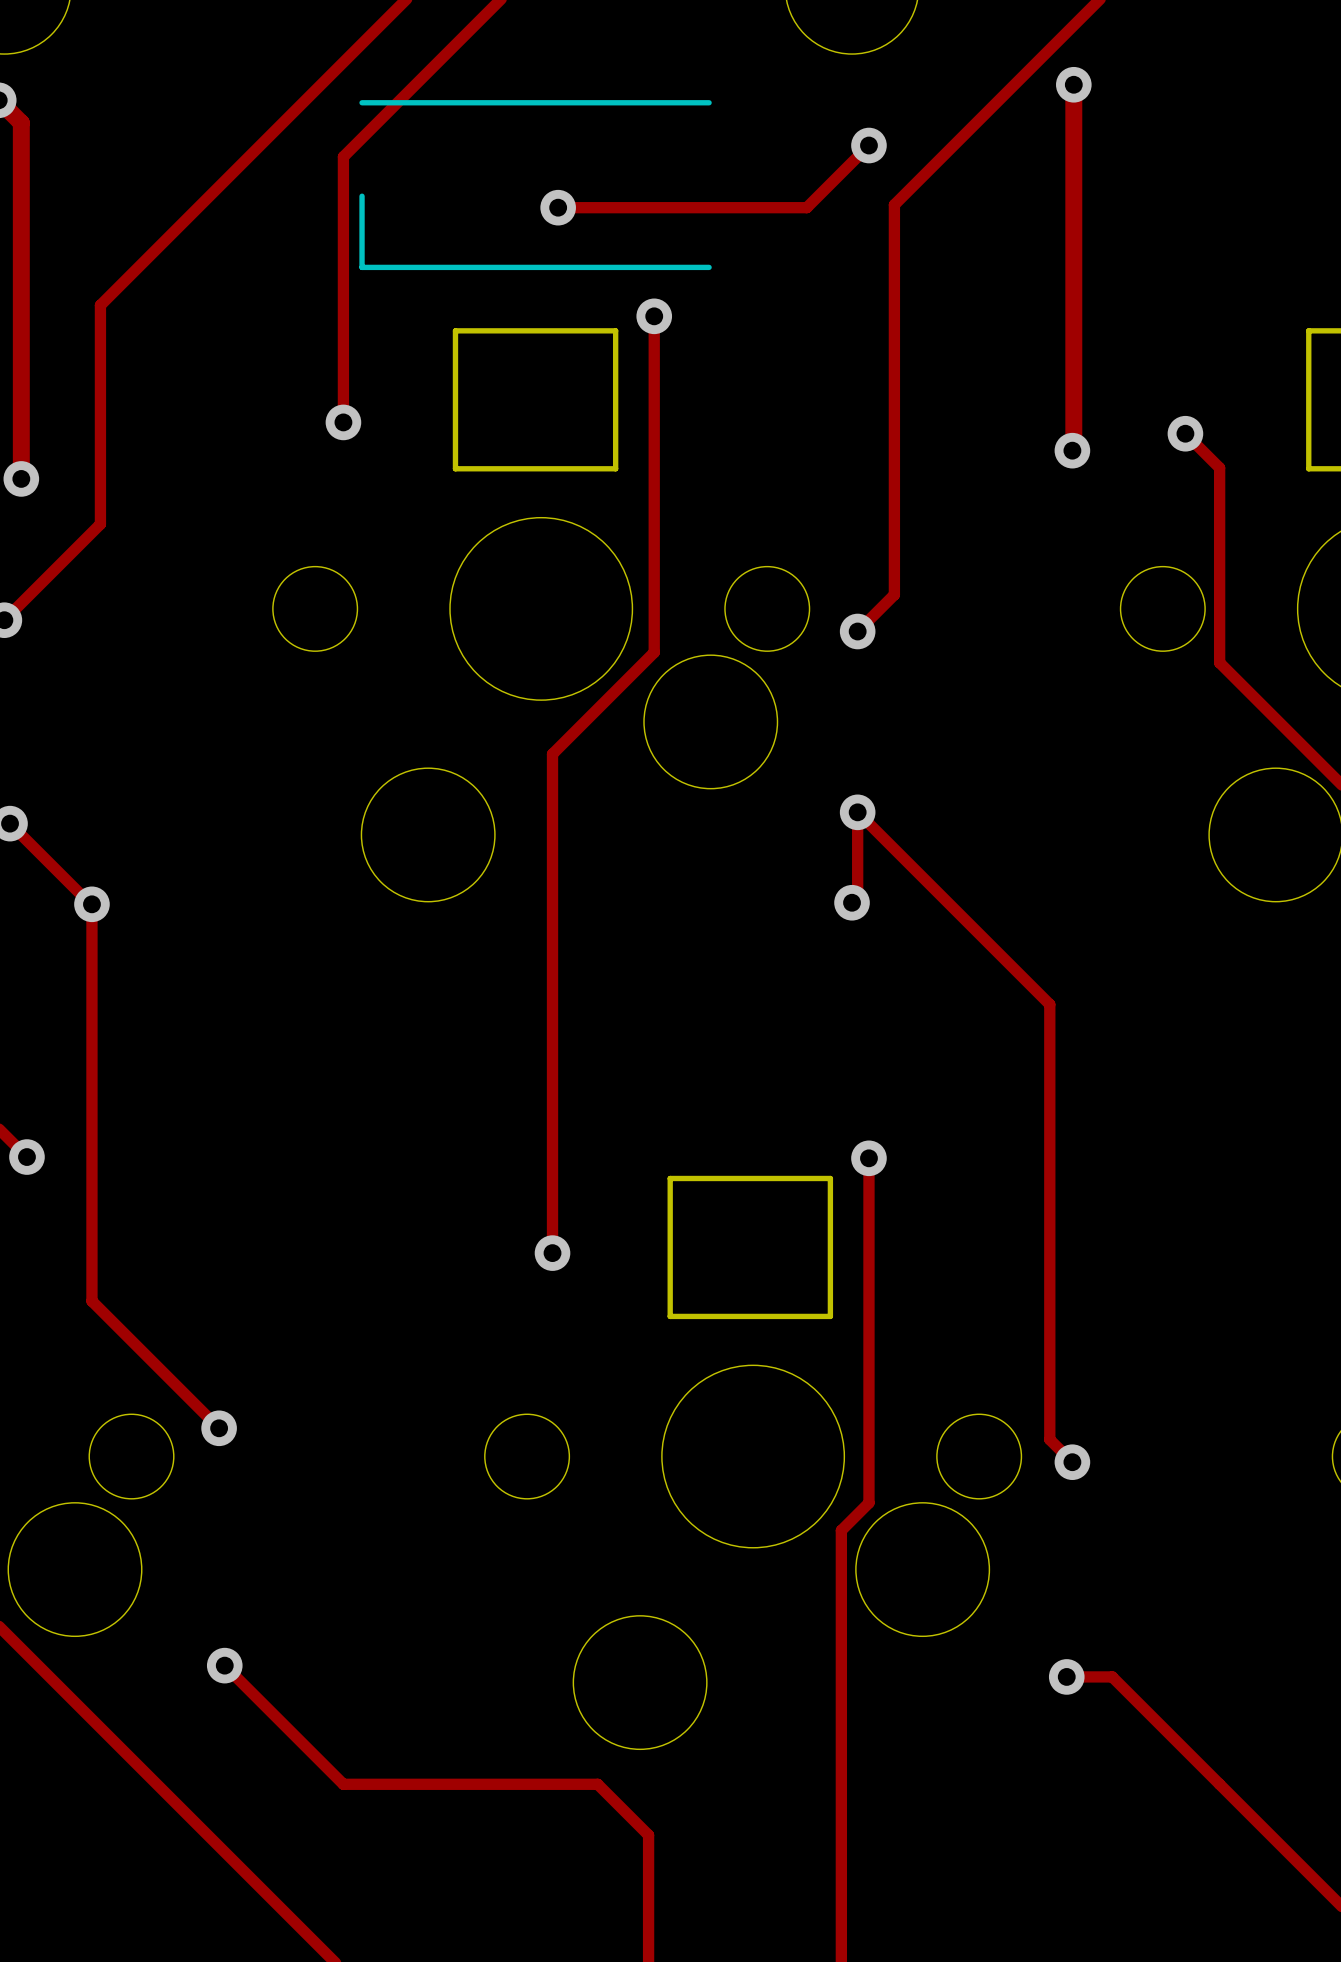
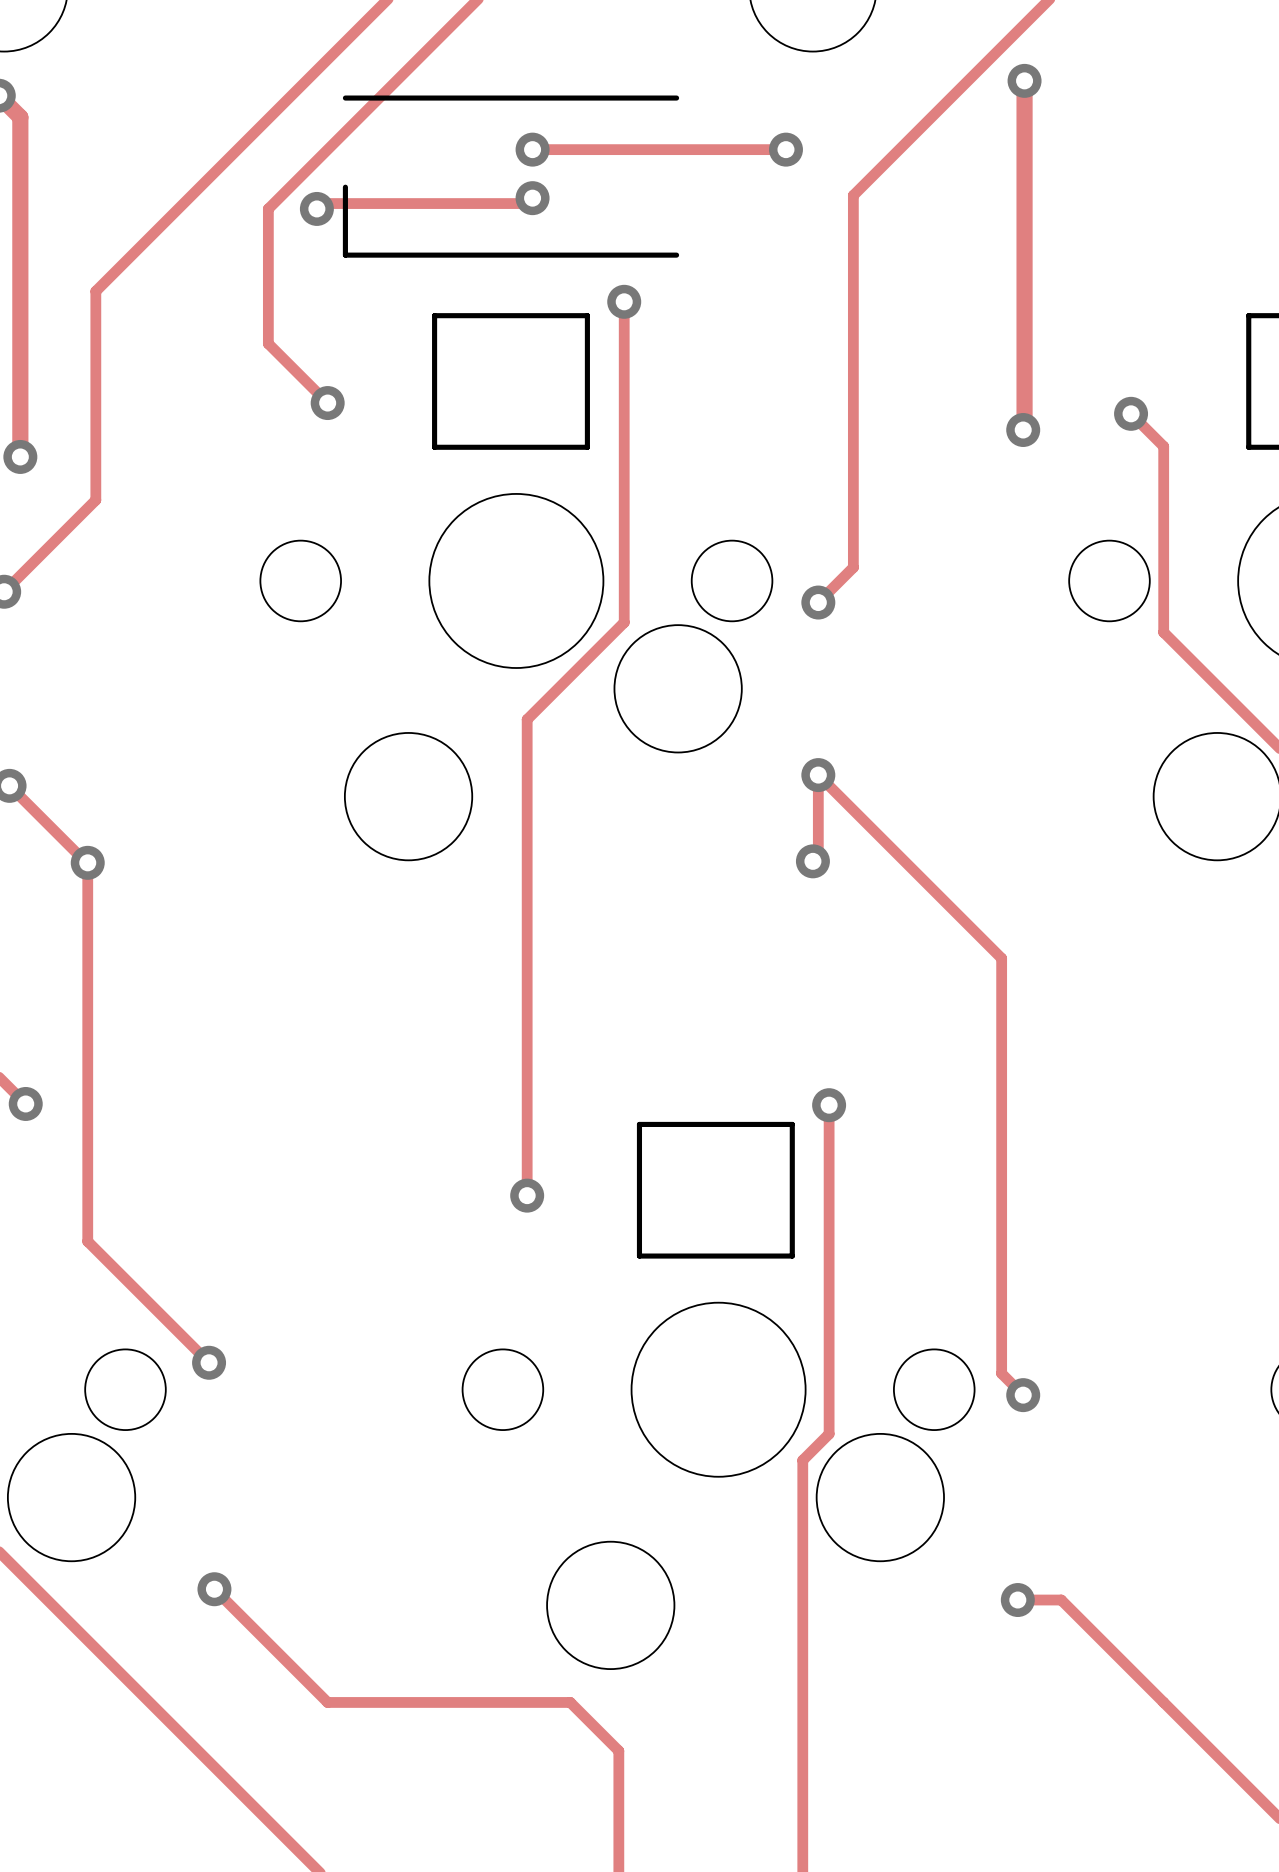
track: (868, 145) (806, 207) (558, 207) -> none
via position: (868, 145) -> (785, 149)
track: (343, 156) (343, 422) -> (327, 149) (268, 208) (268, 343) (327, 403)
track: none -> (532, 149) (785, 149)
via: none -> (532, 149)
track: none -> (532, 203) (322, 203) (316, 208)
via: none -> (316, 208)

